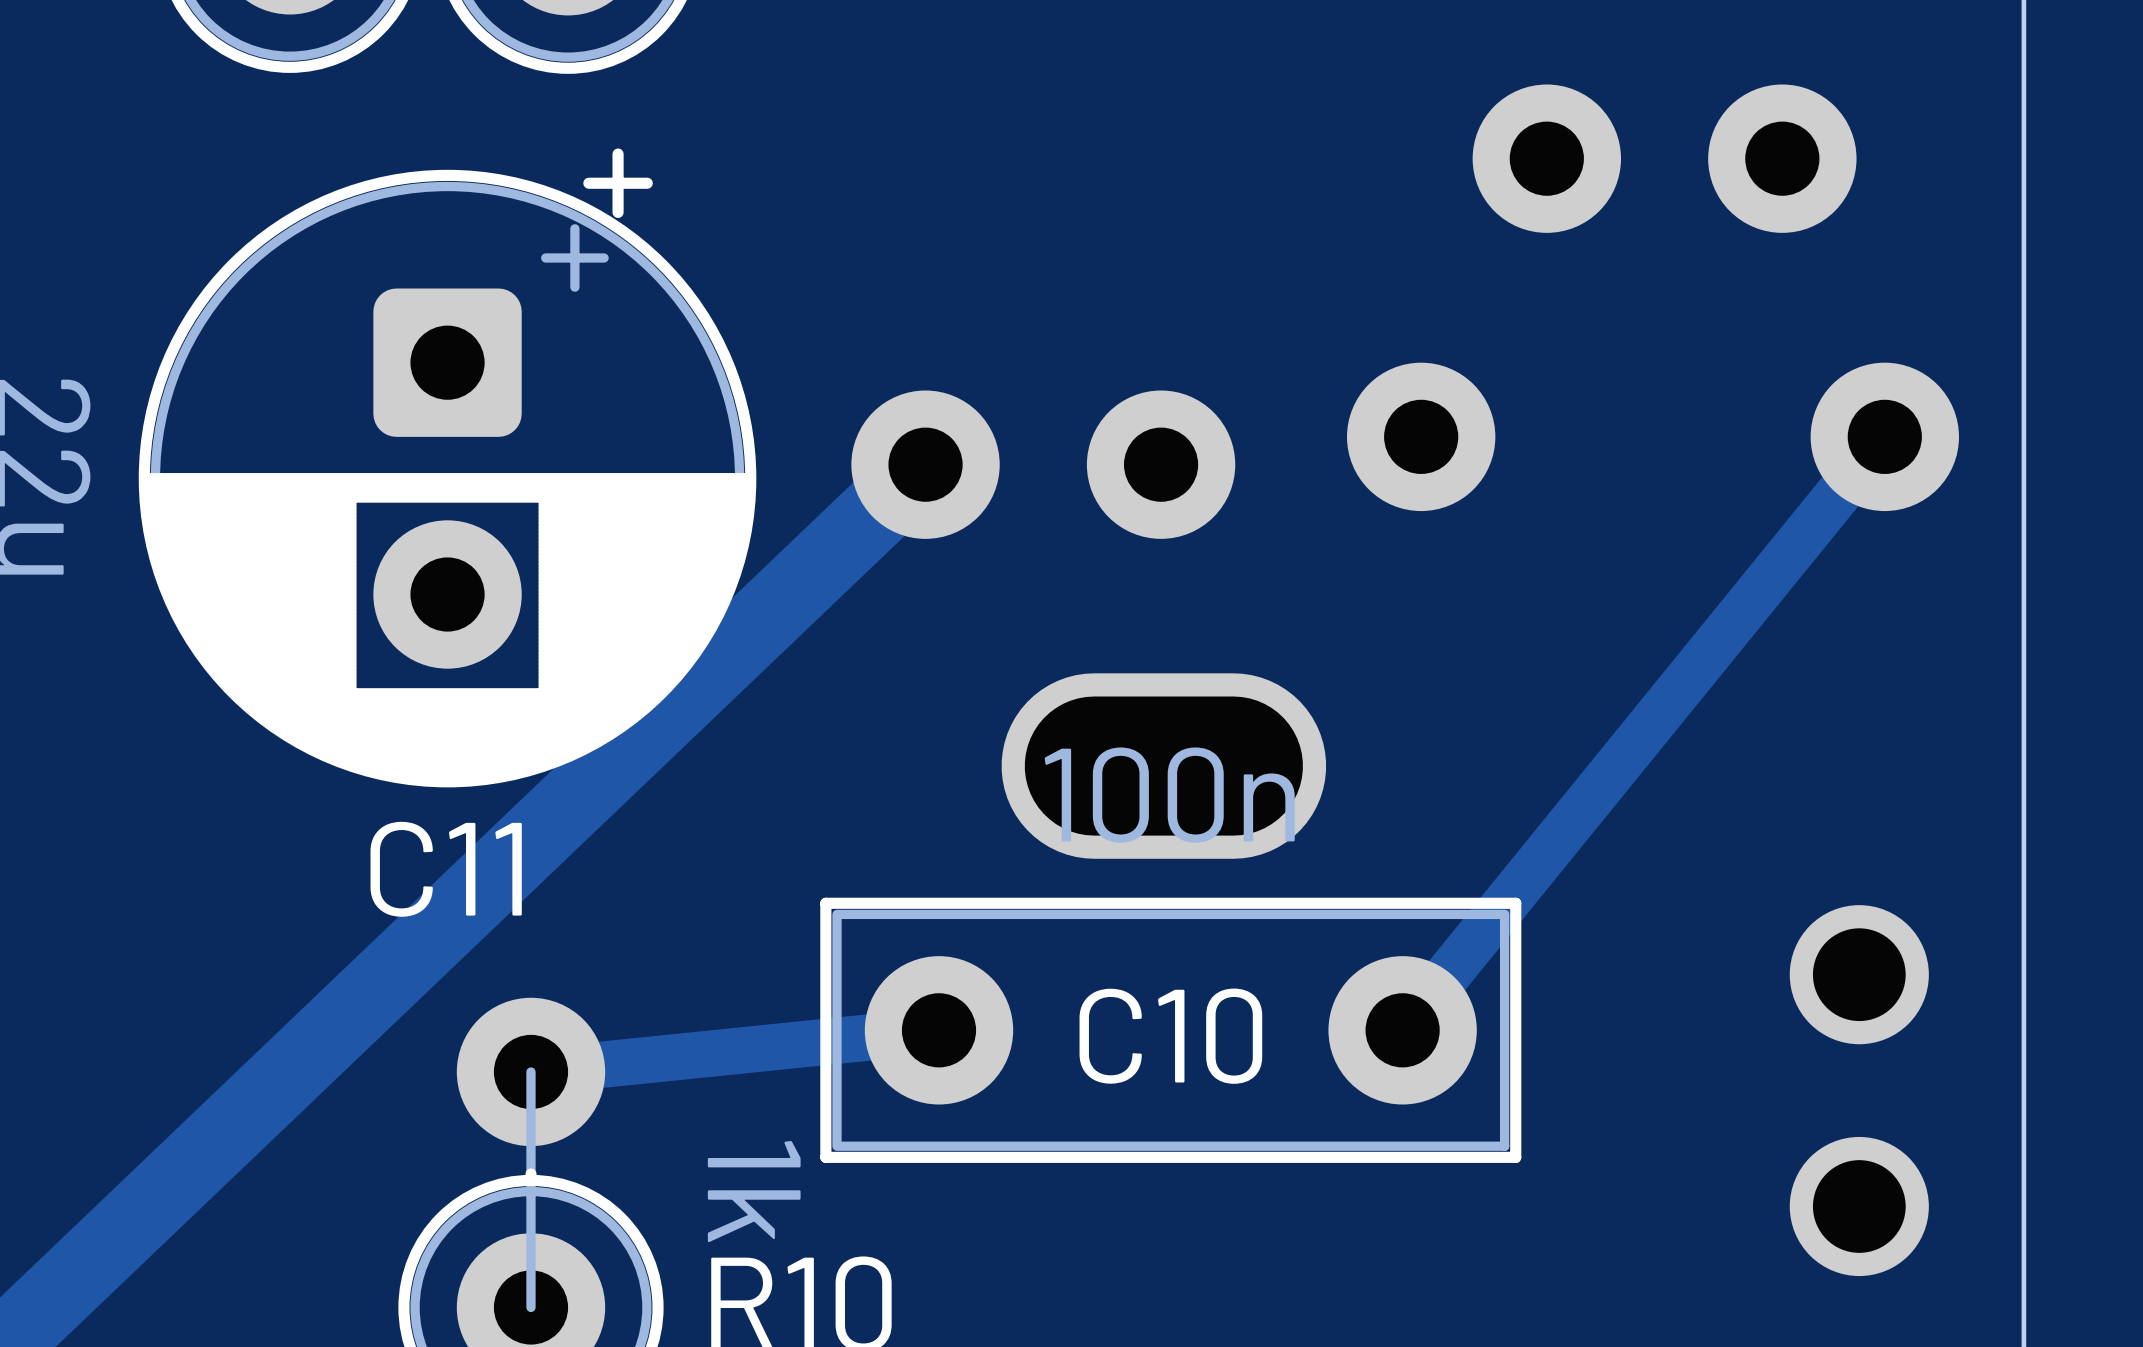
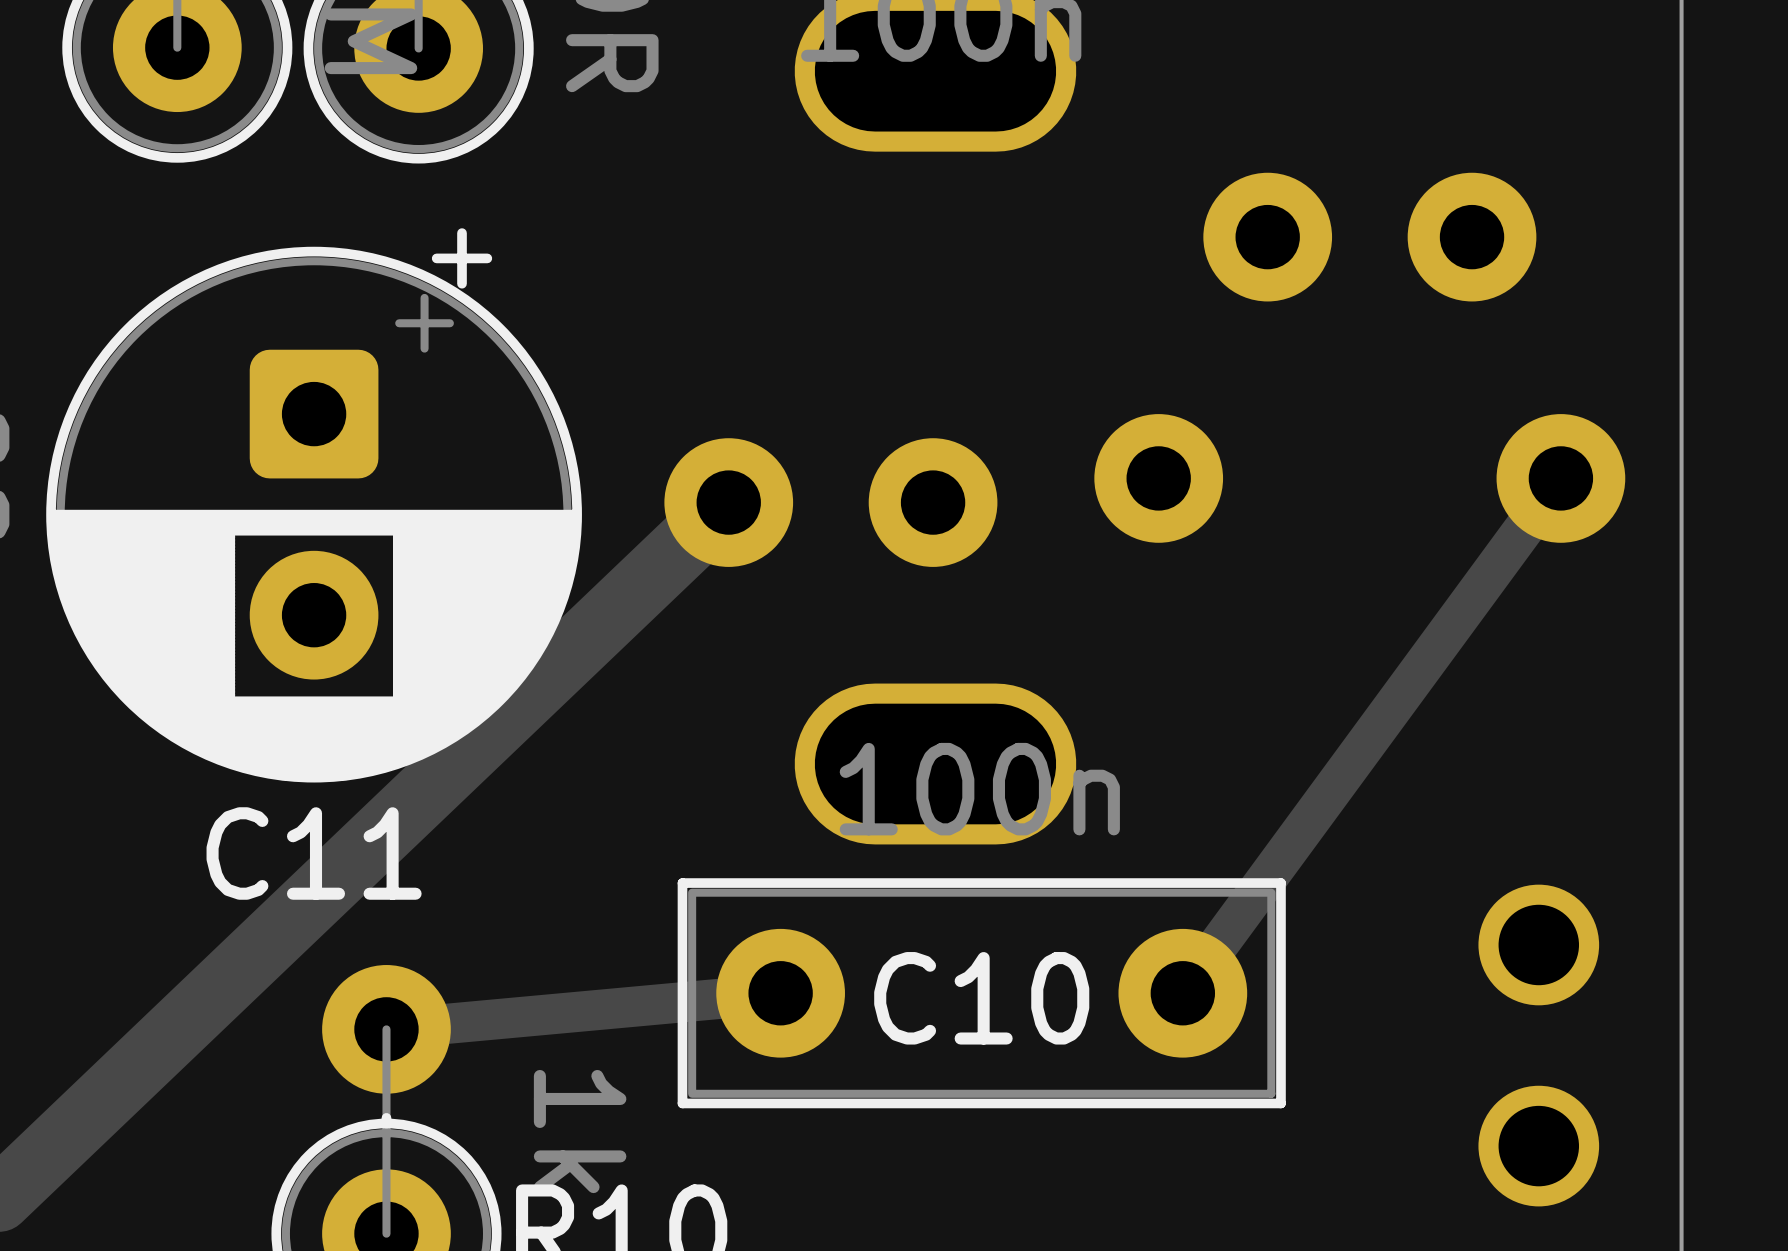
track: (1884, 436) (1402, 1030) -> (1560, 478) (1182, 993)
track: (938, 1030) (530, 1071) -> (780, 993) (386, 1029)
C10 position: (1170, 1030) -> (981, 993)

